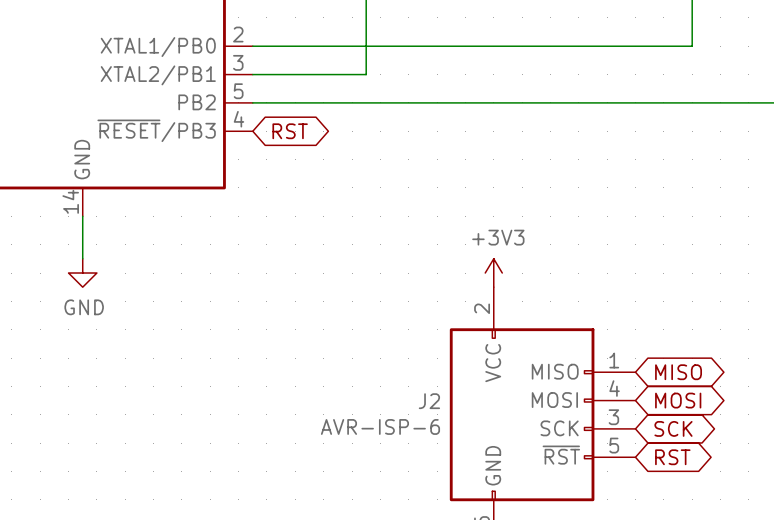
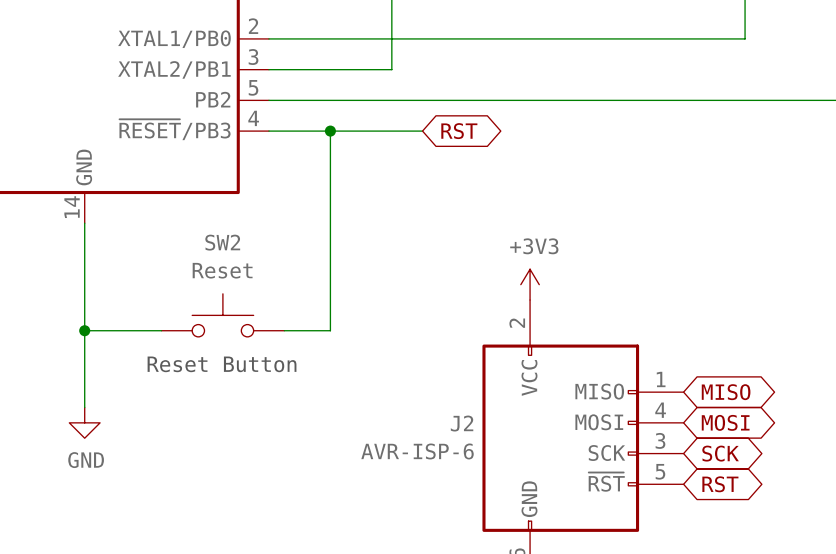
wire: none -> (268, 131) (422, 131)
global label position: RST (290, 131) -> RST (459, 131)
wire: none -> (330, 131) (330, 330) (284, 330)
junction: none -> (330, 131)
wire: none -> (84, 269) (84, 407)
power symbol position: GND (82, 273) -> GND (84, 422)
SW2: none -> Reset (222, 315)
wire: none -> (84, 330) (161, 330)
junction: none -> (84, 330)
text: none -> Reset Button (222, 364)

